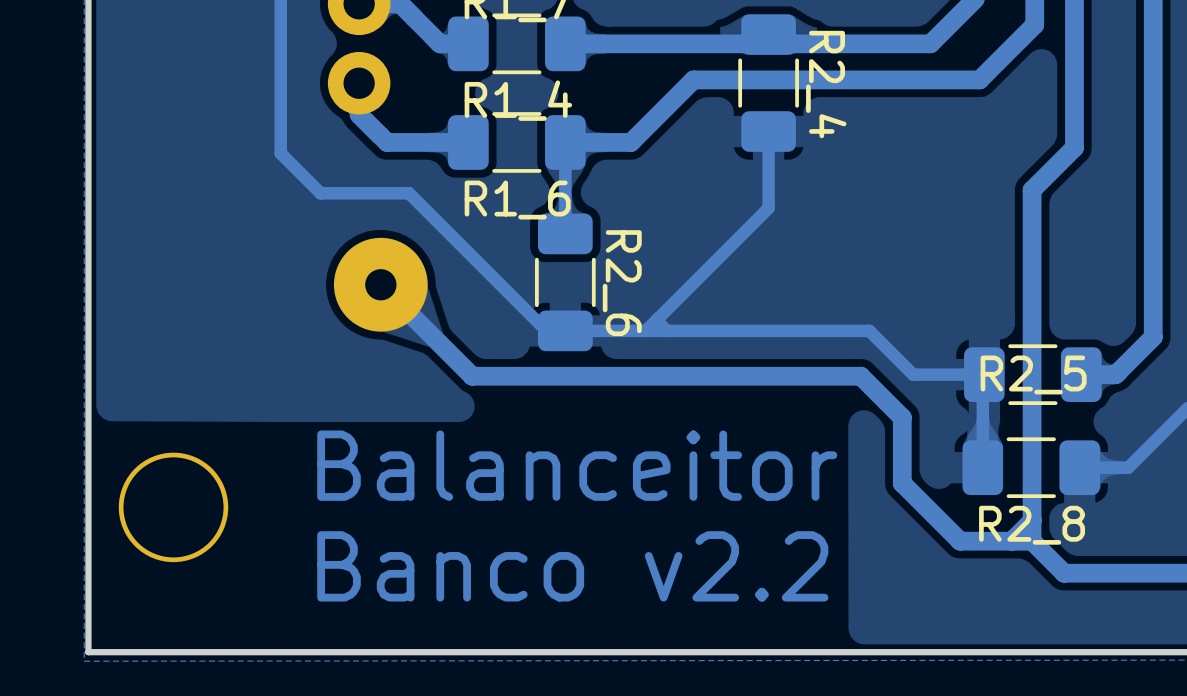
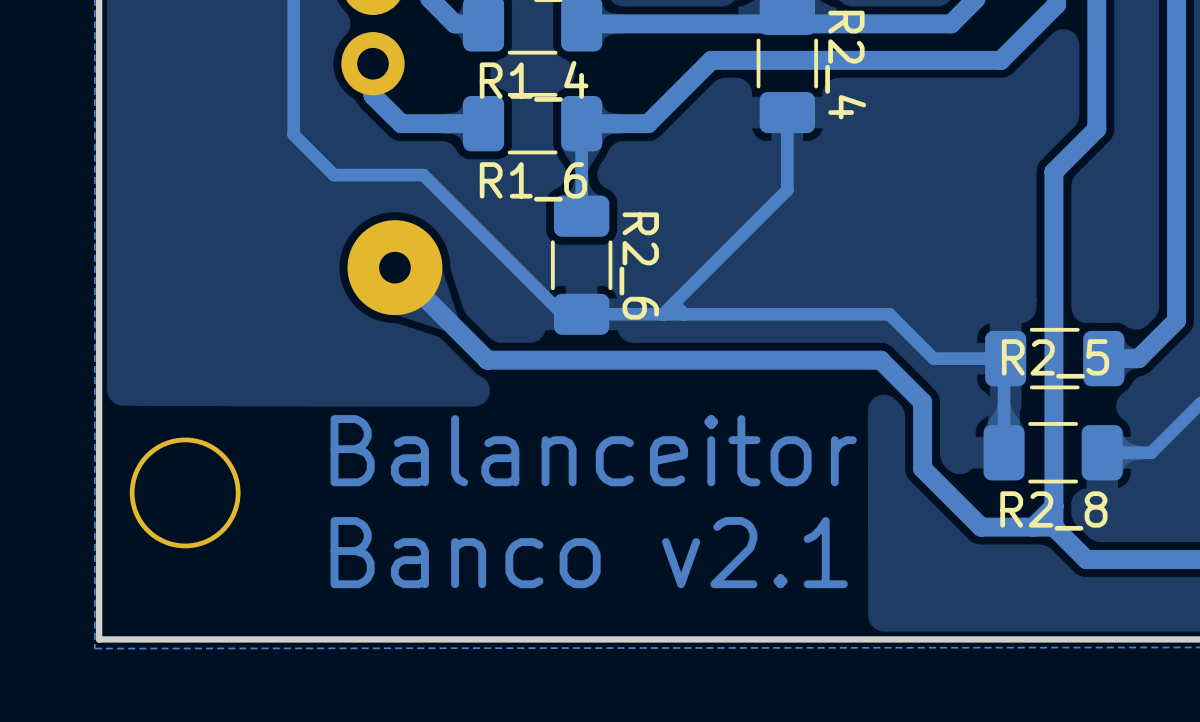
text: Banco v2.2 (572, 566) -> Banco v2.1 (589, 552)

